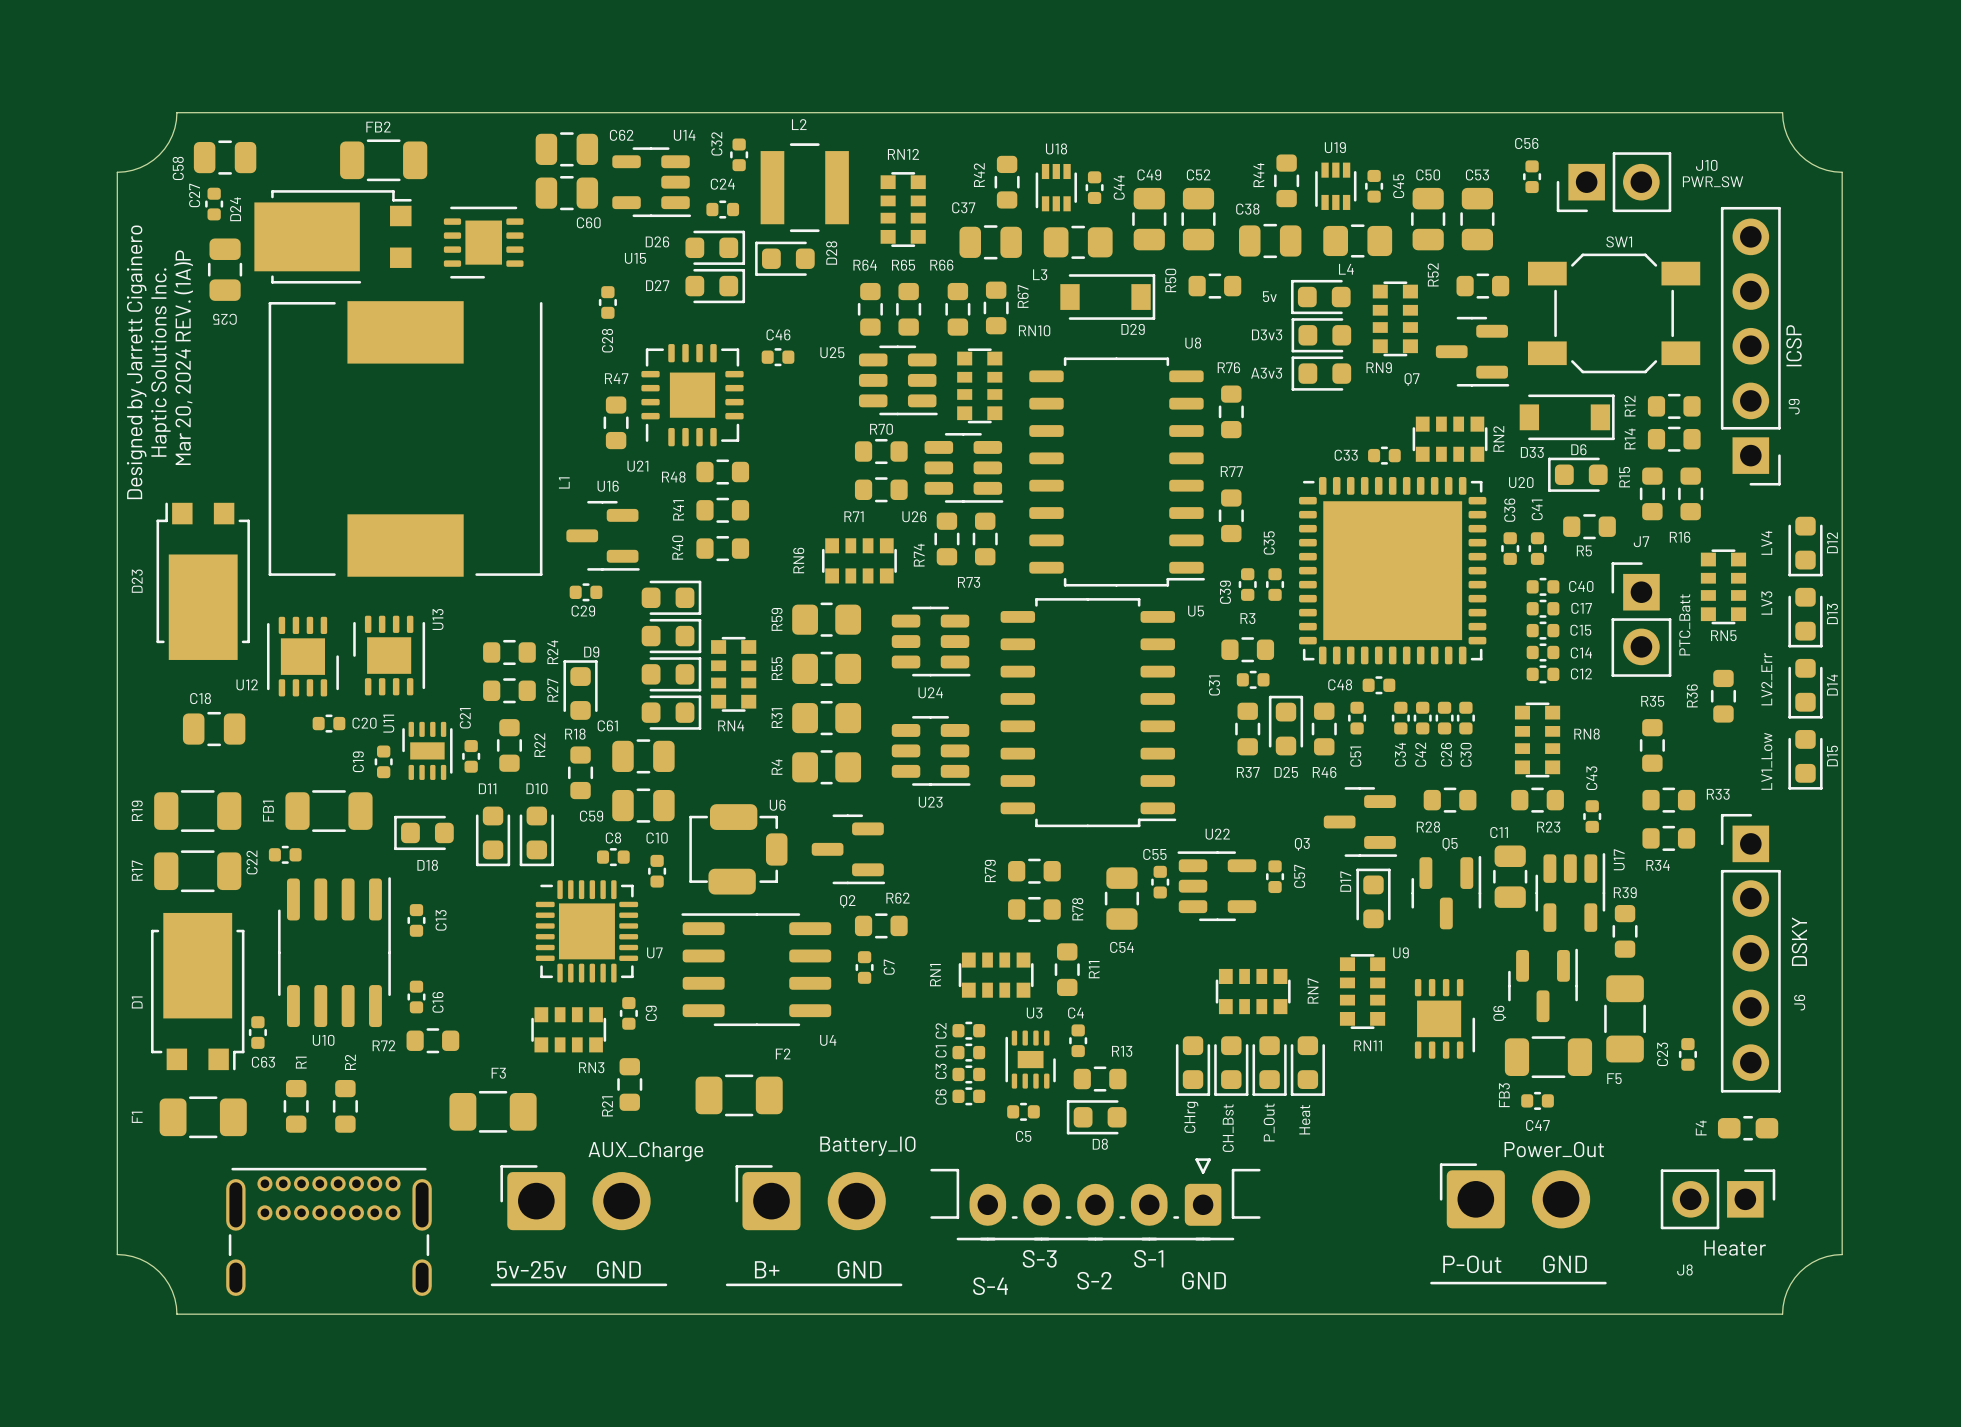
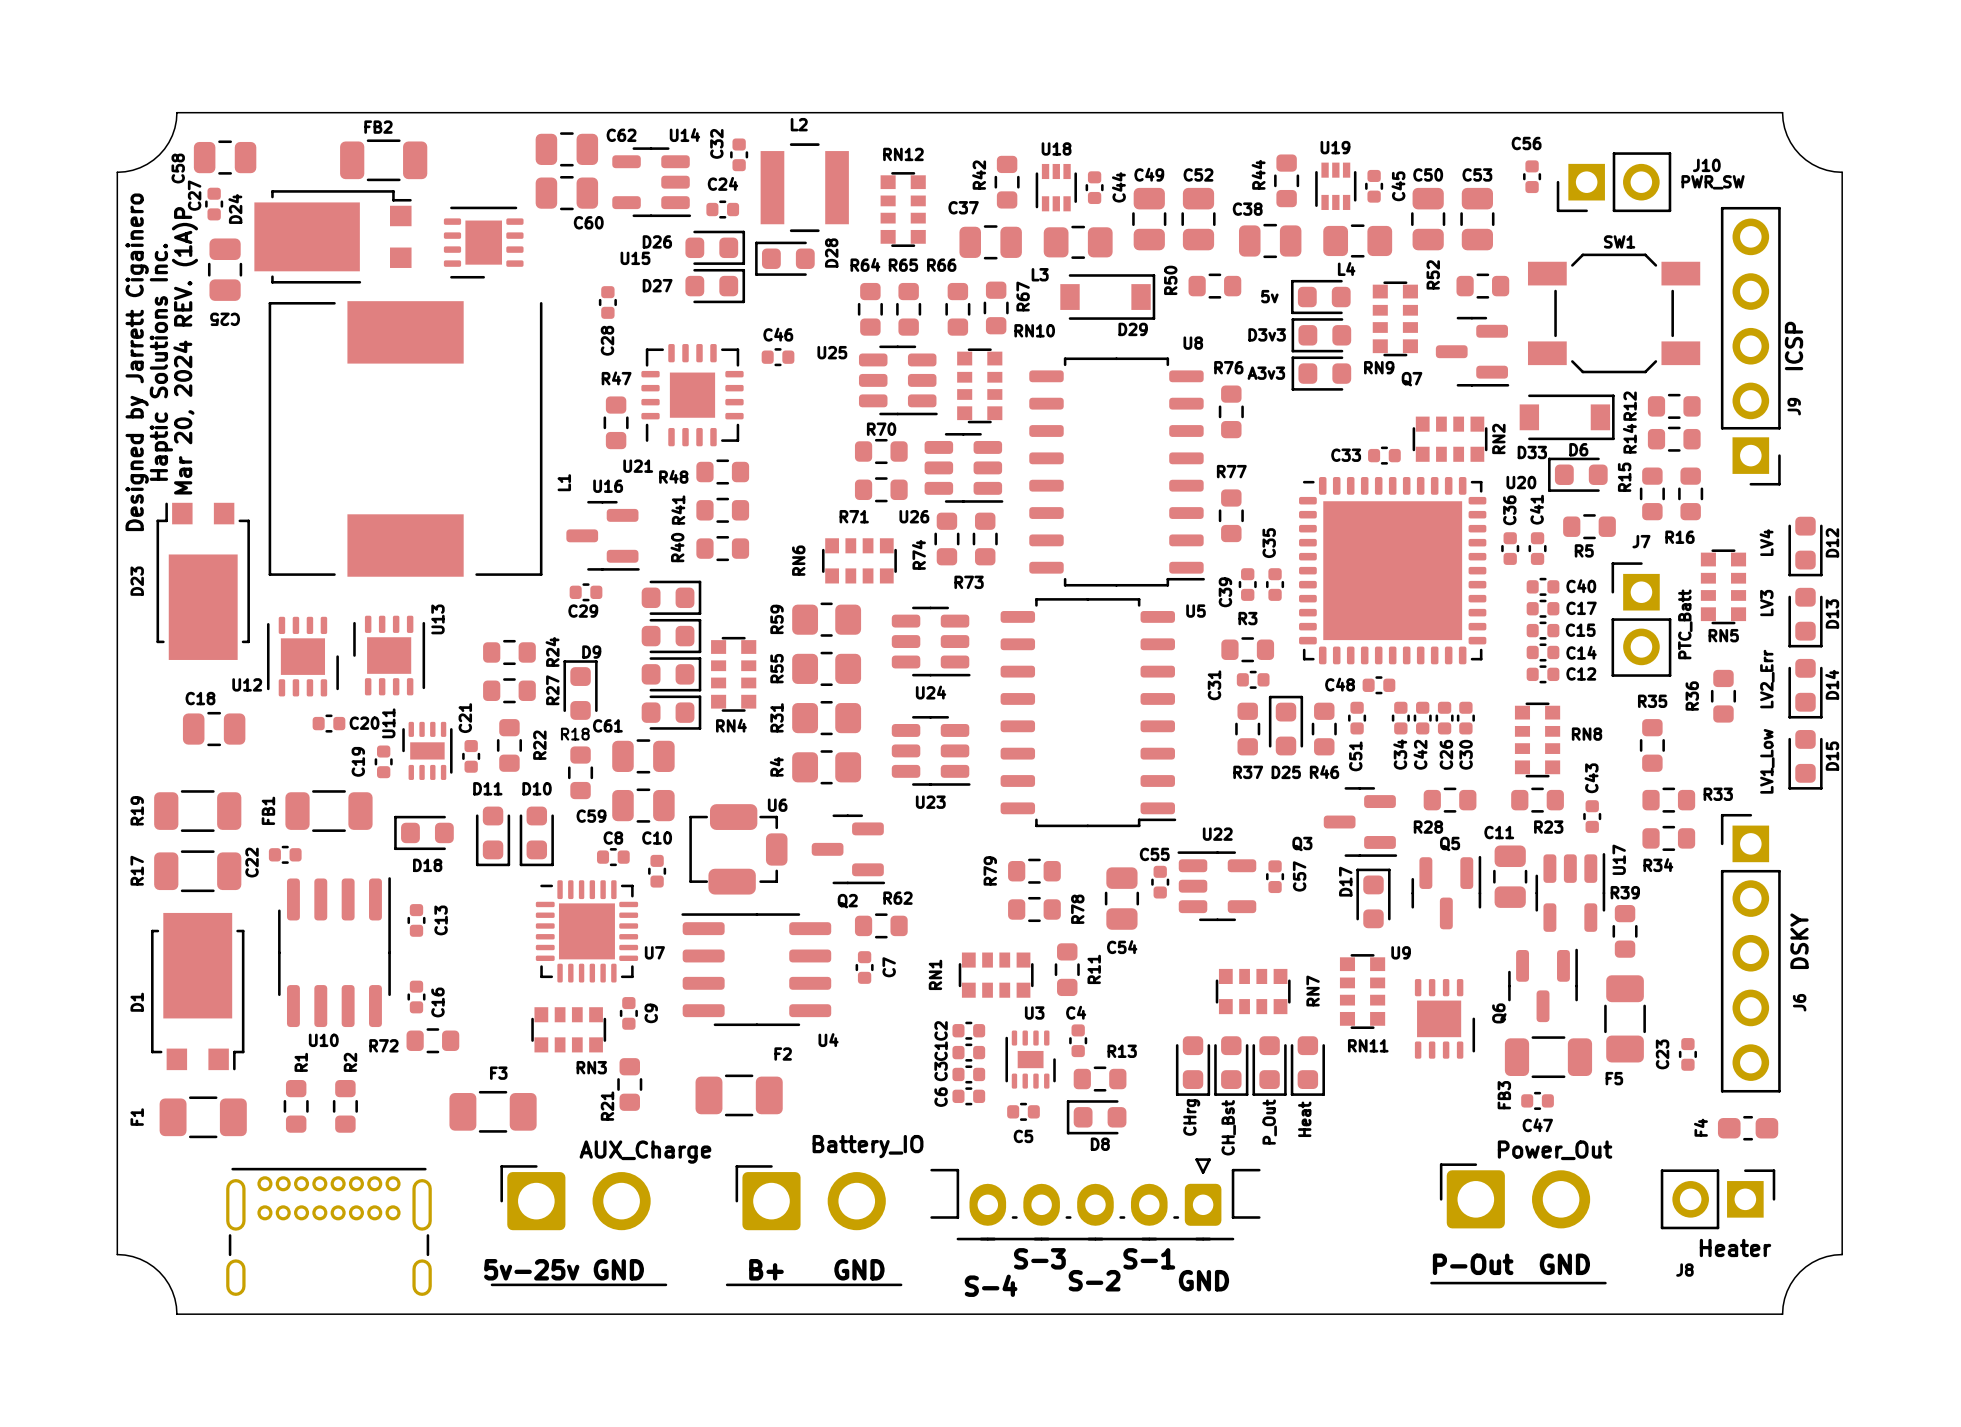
C63: (257, 1032) -> none

